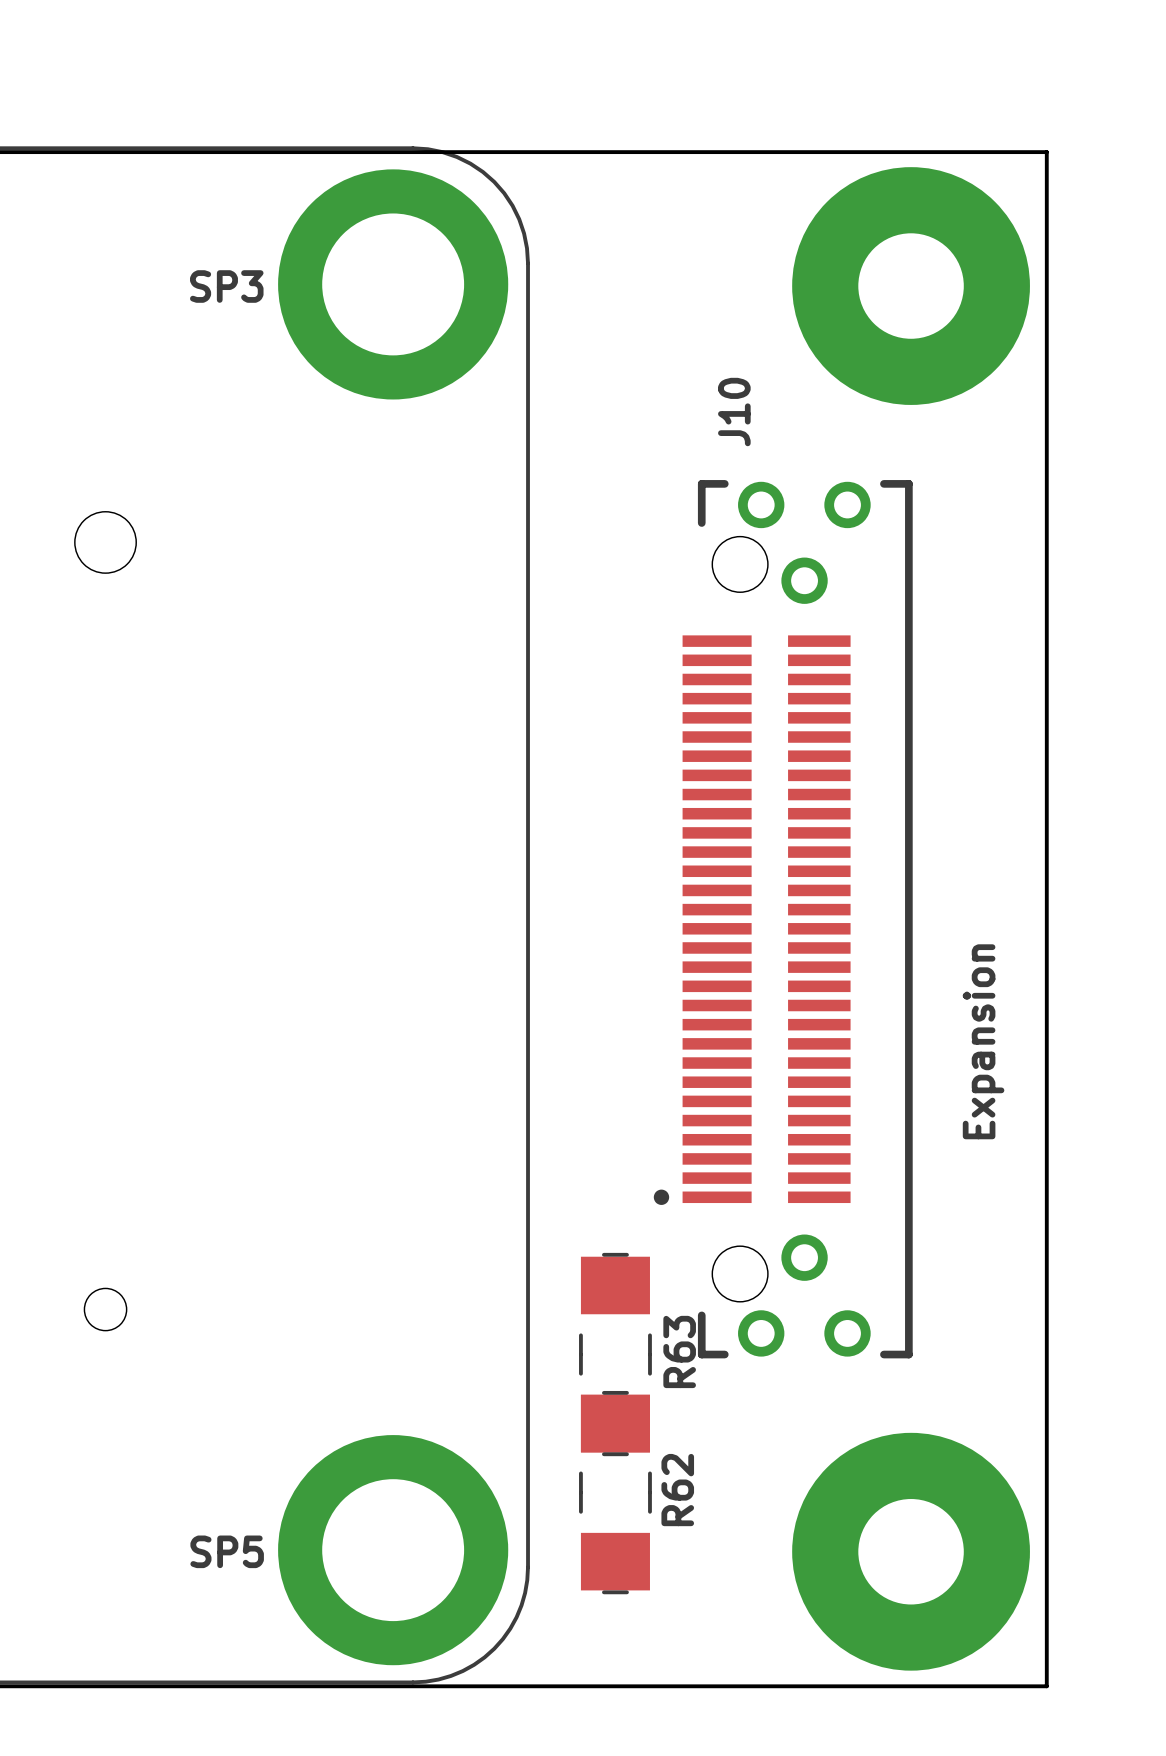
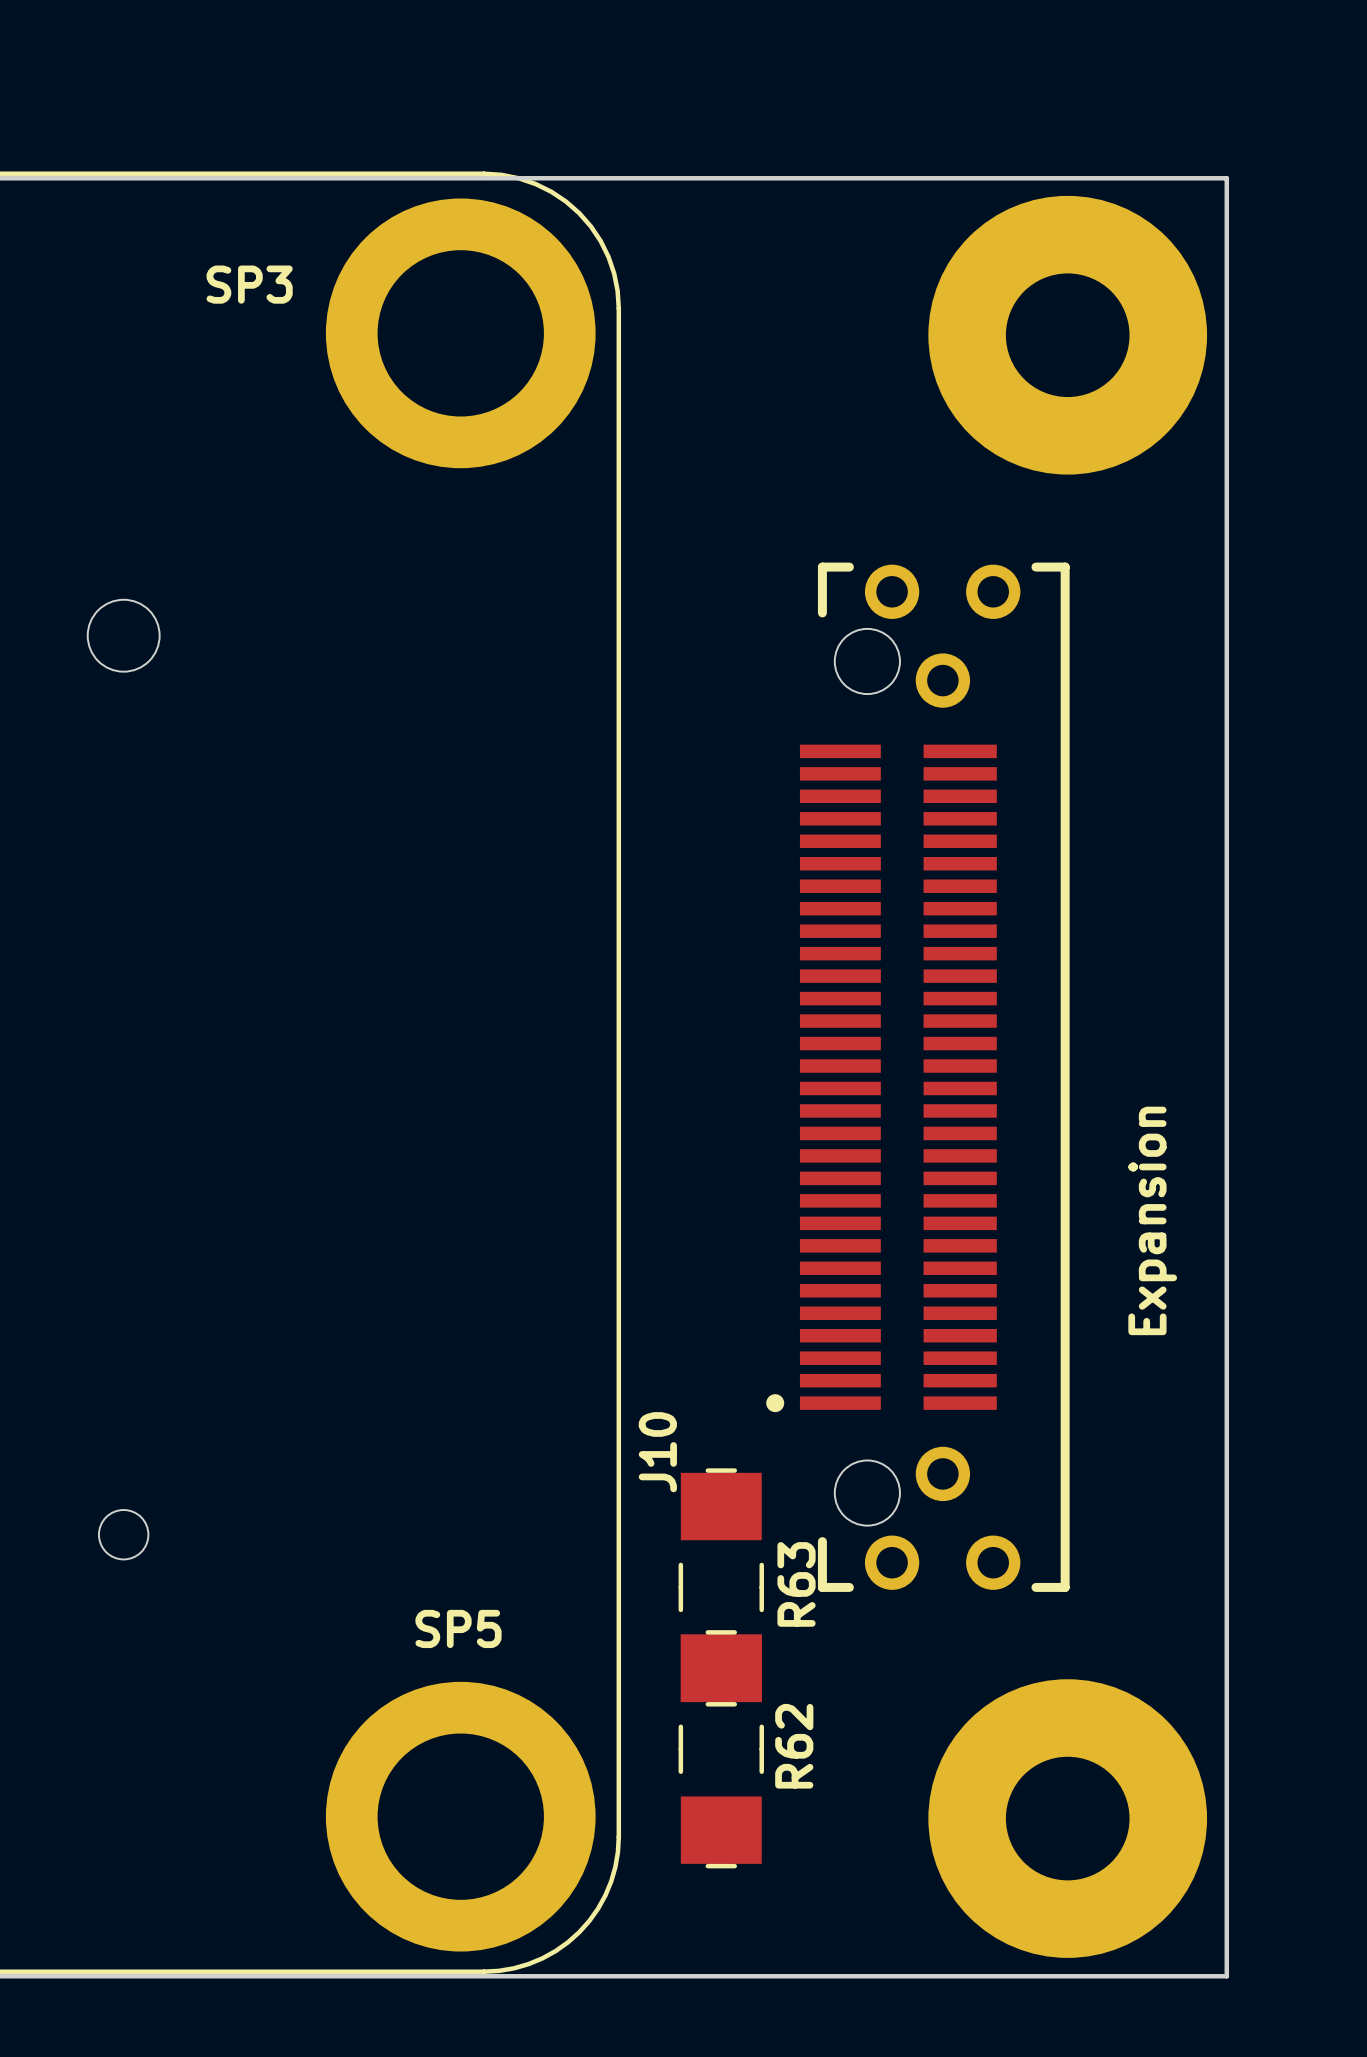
SP3 name position: SP3 (226, 286) -> SP3 (249, 284)
J10 name position: J10 (734, 412) -> J10 (657, 1452)
SP5 name position: SP5 (227, 1551) -> SP5 (458, 1628)

